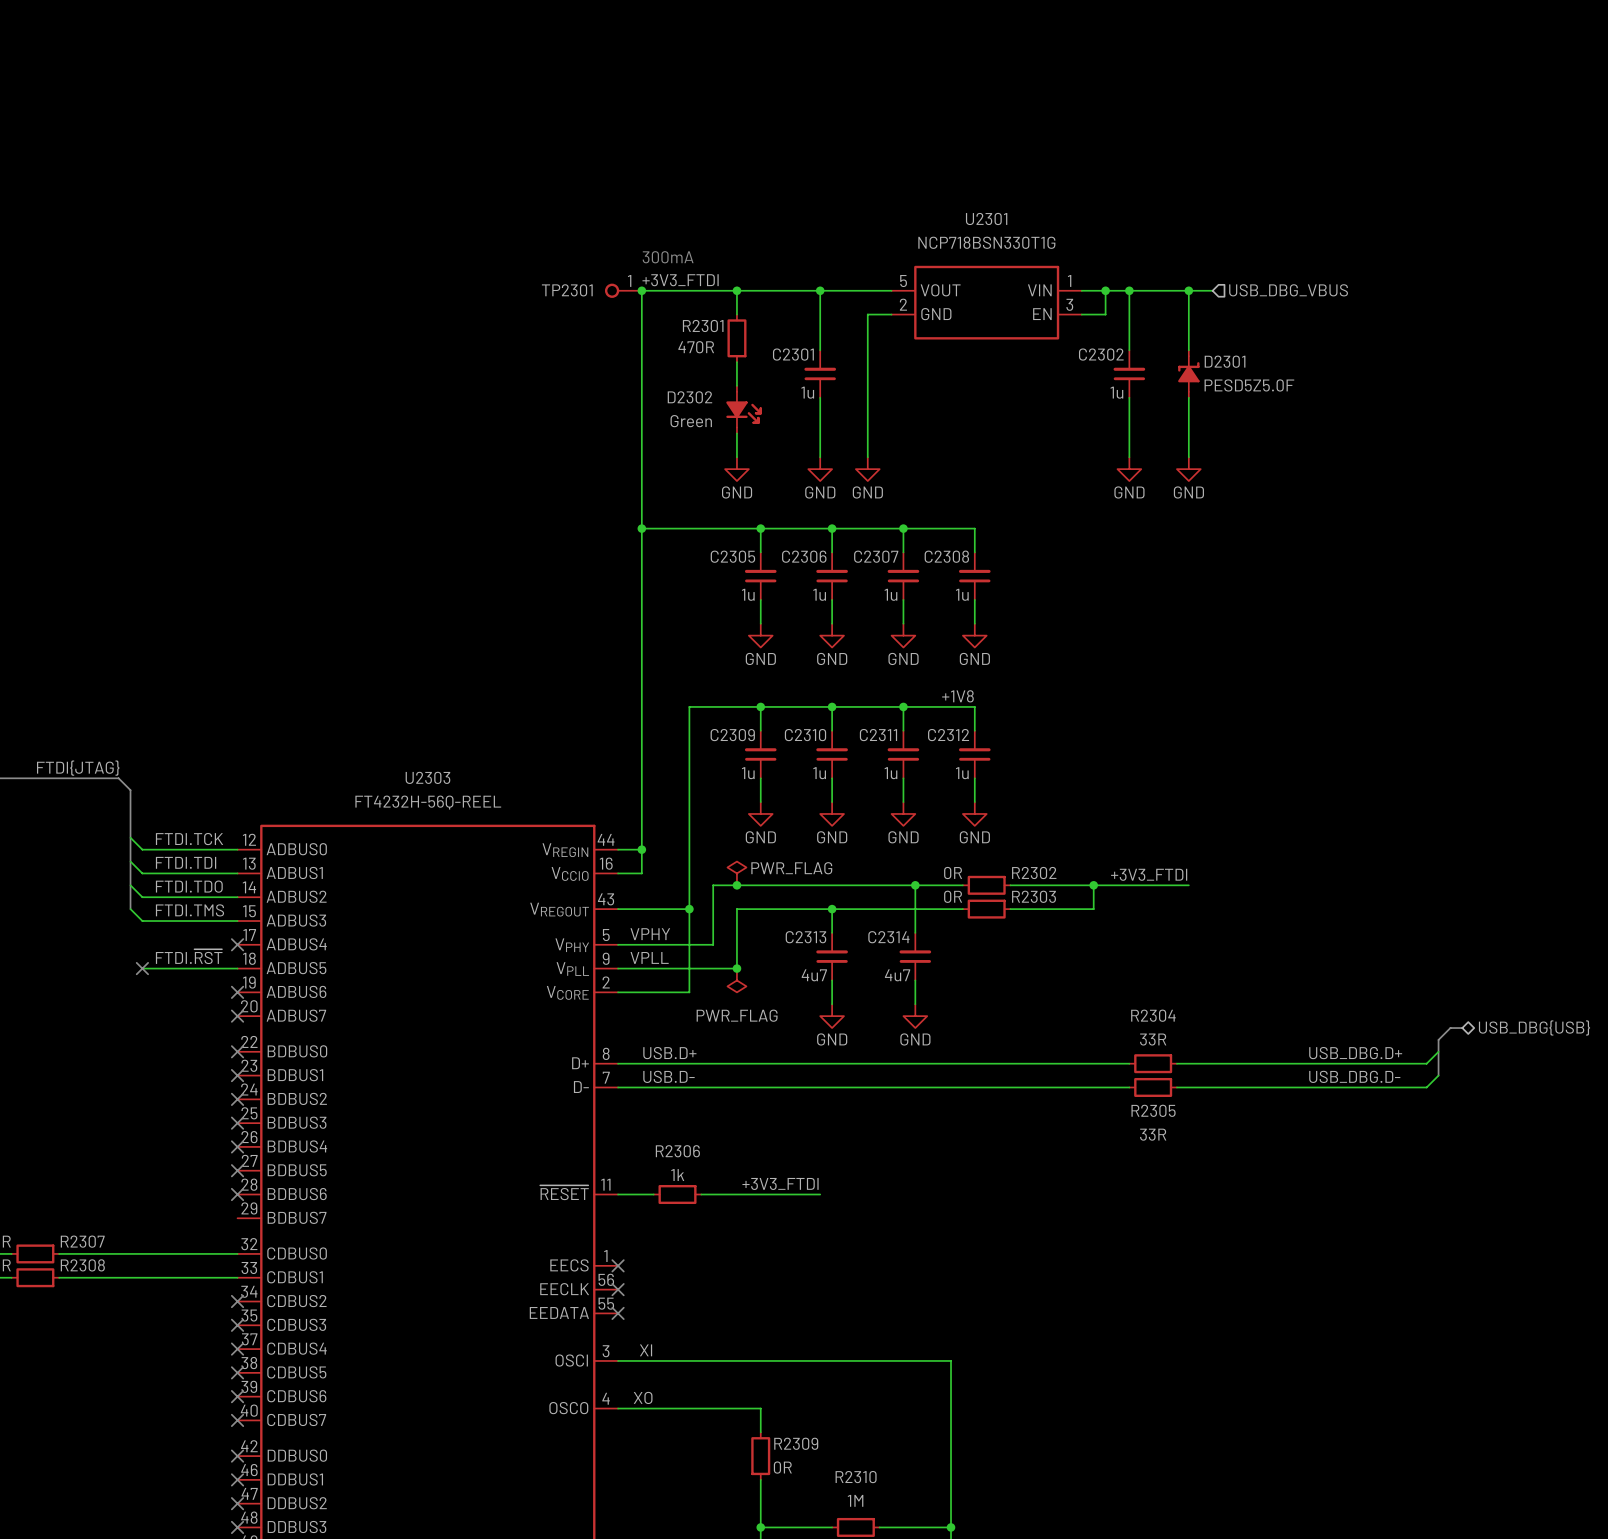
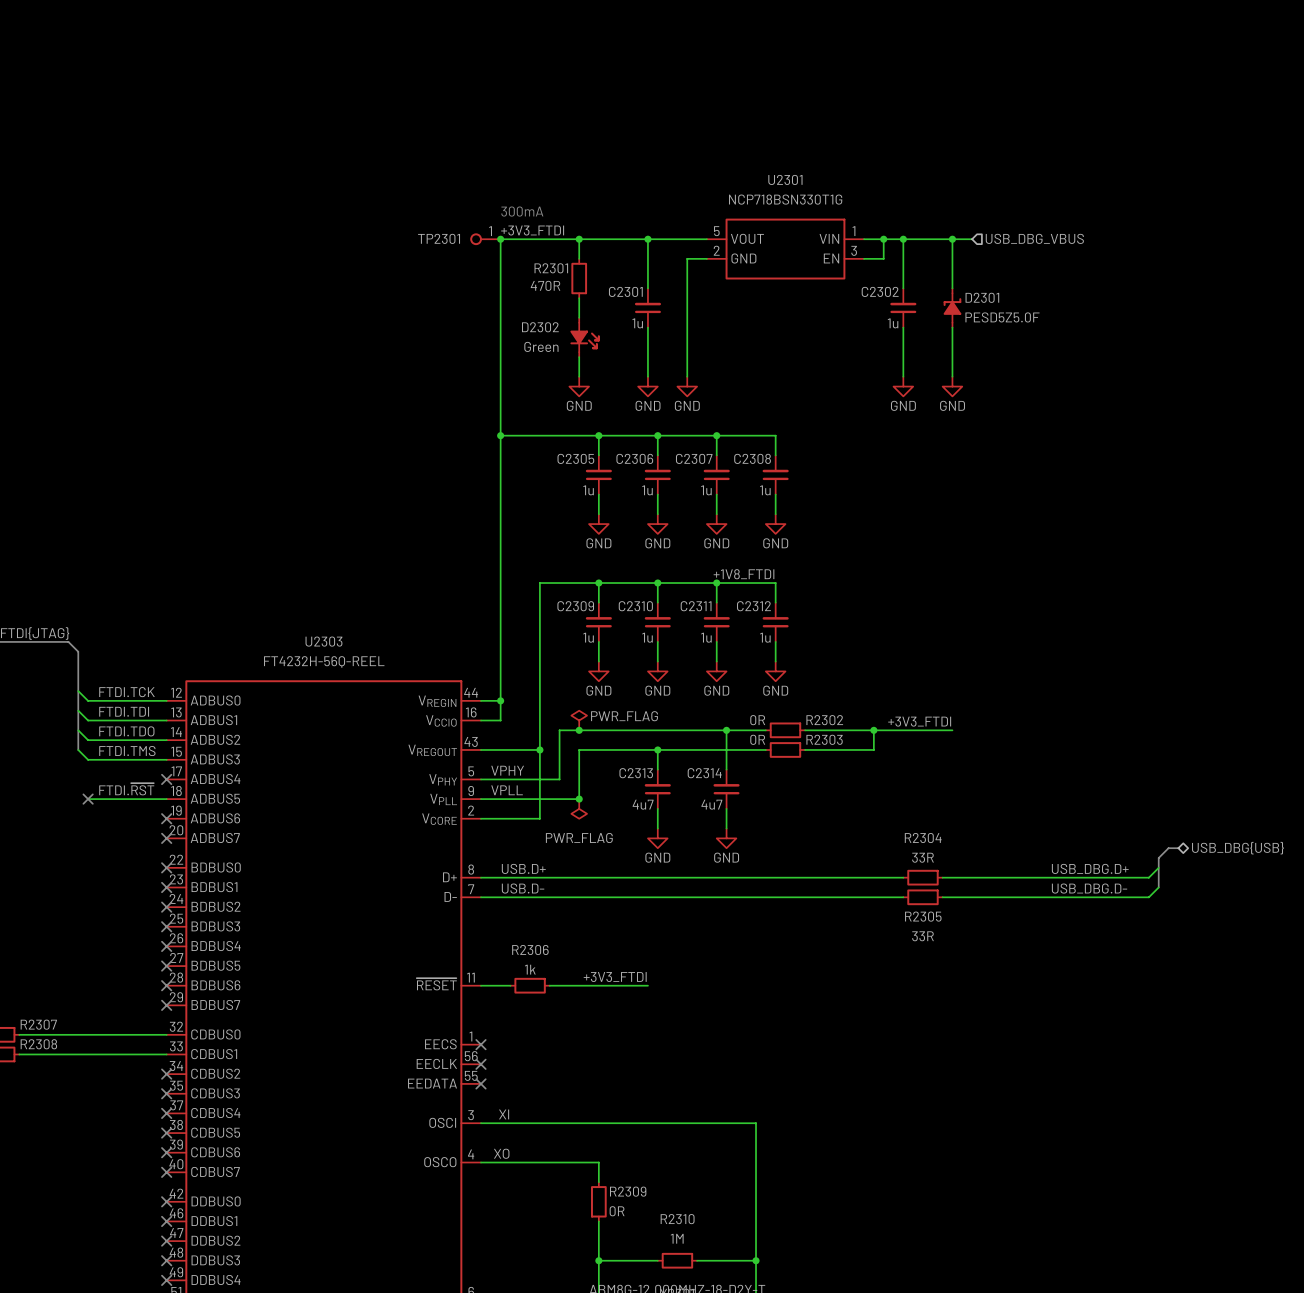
label: +1V8 (957, 696) -> +1V8_FTDI (743, 574)
no-connect mark: none -> (166, 1005)

